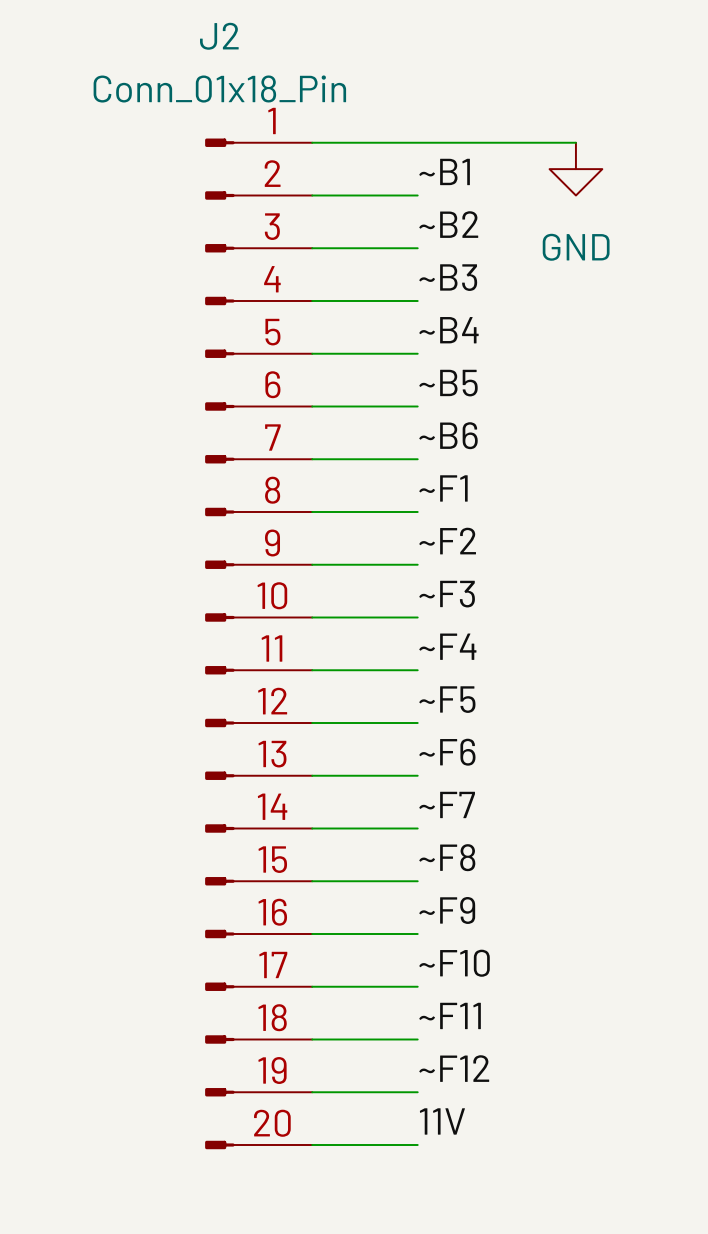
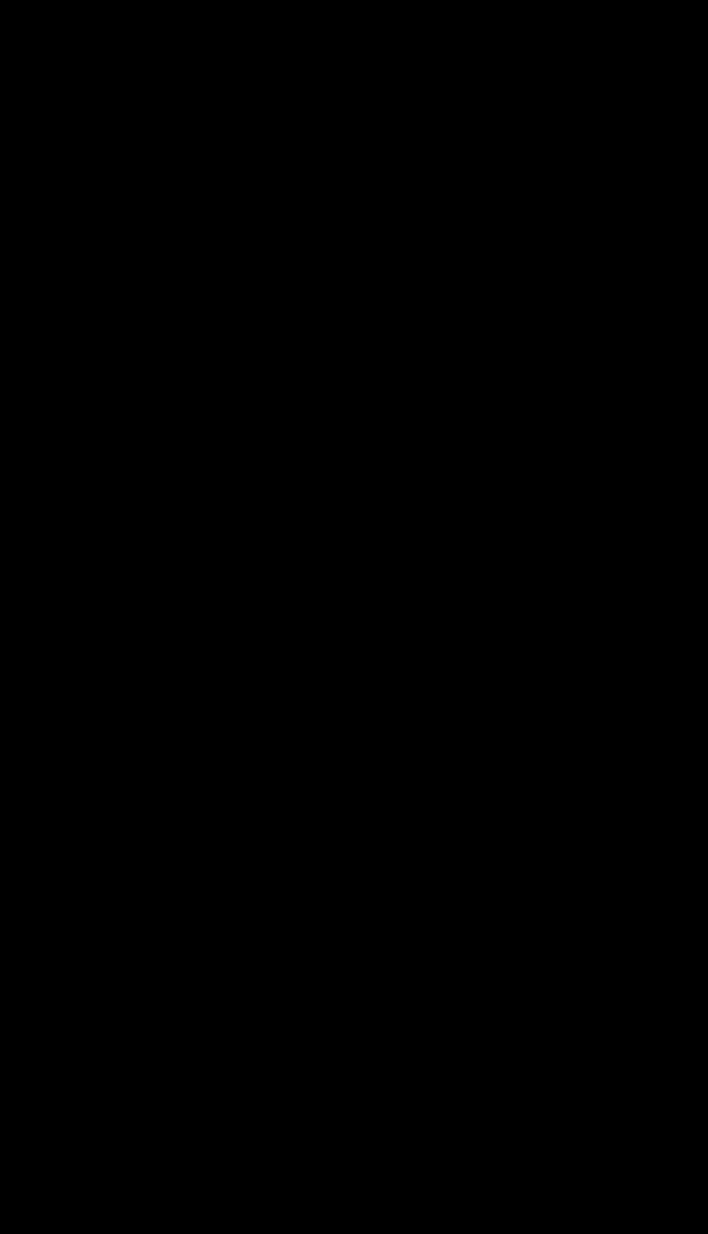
wire: (312, 142) (575, 142) -> none
power symbol: GND (575, 169) -> none
label: ~B1 (444, 171) -> none
wire: (312, 195) (417, 195) -> none
label: ~B2 (448, 224) -> none
wire: (312, 248) (417, 248) -> none
label: ~B3 (448, 277) -> none
wire: (312, 300) (417, 300) -> none
label: ~B4 (448, 330) -> none
wire: (312, 353) (417, 353) -> none
label: ~B5 (448, 383) -> none
wire: (312, 406) (417, 406) -> none
label: ~B6 (448, 435) -> none
wire: (312, 459) (417, 459) -> none
label: ~F1 (443, 488) -> none
wire: (312, 511) (417, 511) -> none
label: ~F2 (447, 541) -> none
wire: (312, 564) (417, 564) -> none
label: ~F3 (447, 594) -> none
wire: (312, 617) (417, 617) -> none
J2: Conn_01x18_Pin (258, 643) -> none
label: ~F4 (447, 646) -> none
wire: (312, 670) (417, 670) -> none
label: ~F5 (447, 699) -> none
wire: (312, 722) (417, 722) -> none
label: ~F6 (447, 752) -> none
wire: (312, 775) (417, 775) -> none
label: ~F7 (447, 804) -> none
wire: (312, 828) (417, 828) -> none
label: ~F8 (447, 857) -> none
wire: (312, 881) (417, 881) -> none
label: ~F9 (447, 910) -> none
wire: (312, 933) (417, 933) -> none
label: ~F10 (454, 963) -> none
wire: (312, 986) (417, 986) -> none
label: ~F11 (450, 1015) -> none
wire: (312, 1039) (417, 1039) -> none
label: ~F12 (454, 1068) -> none
wire: (312, 1092) (417, 1092) -> none
label: 11V (442, 1121) -> none
wire: (312, 1145) (417, 1145) -> none

